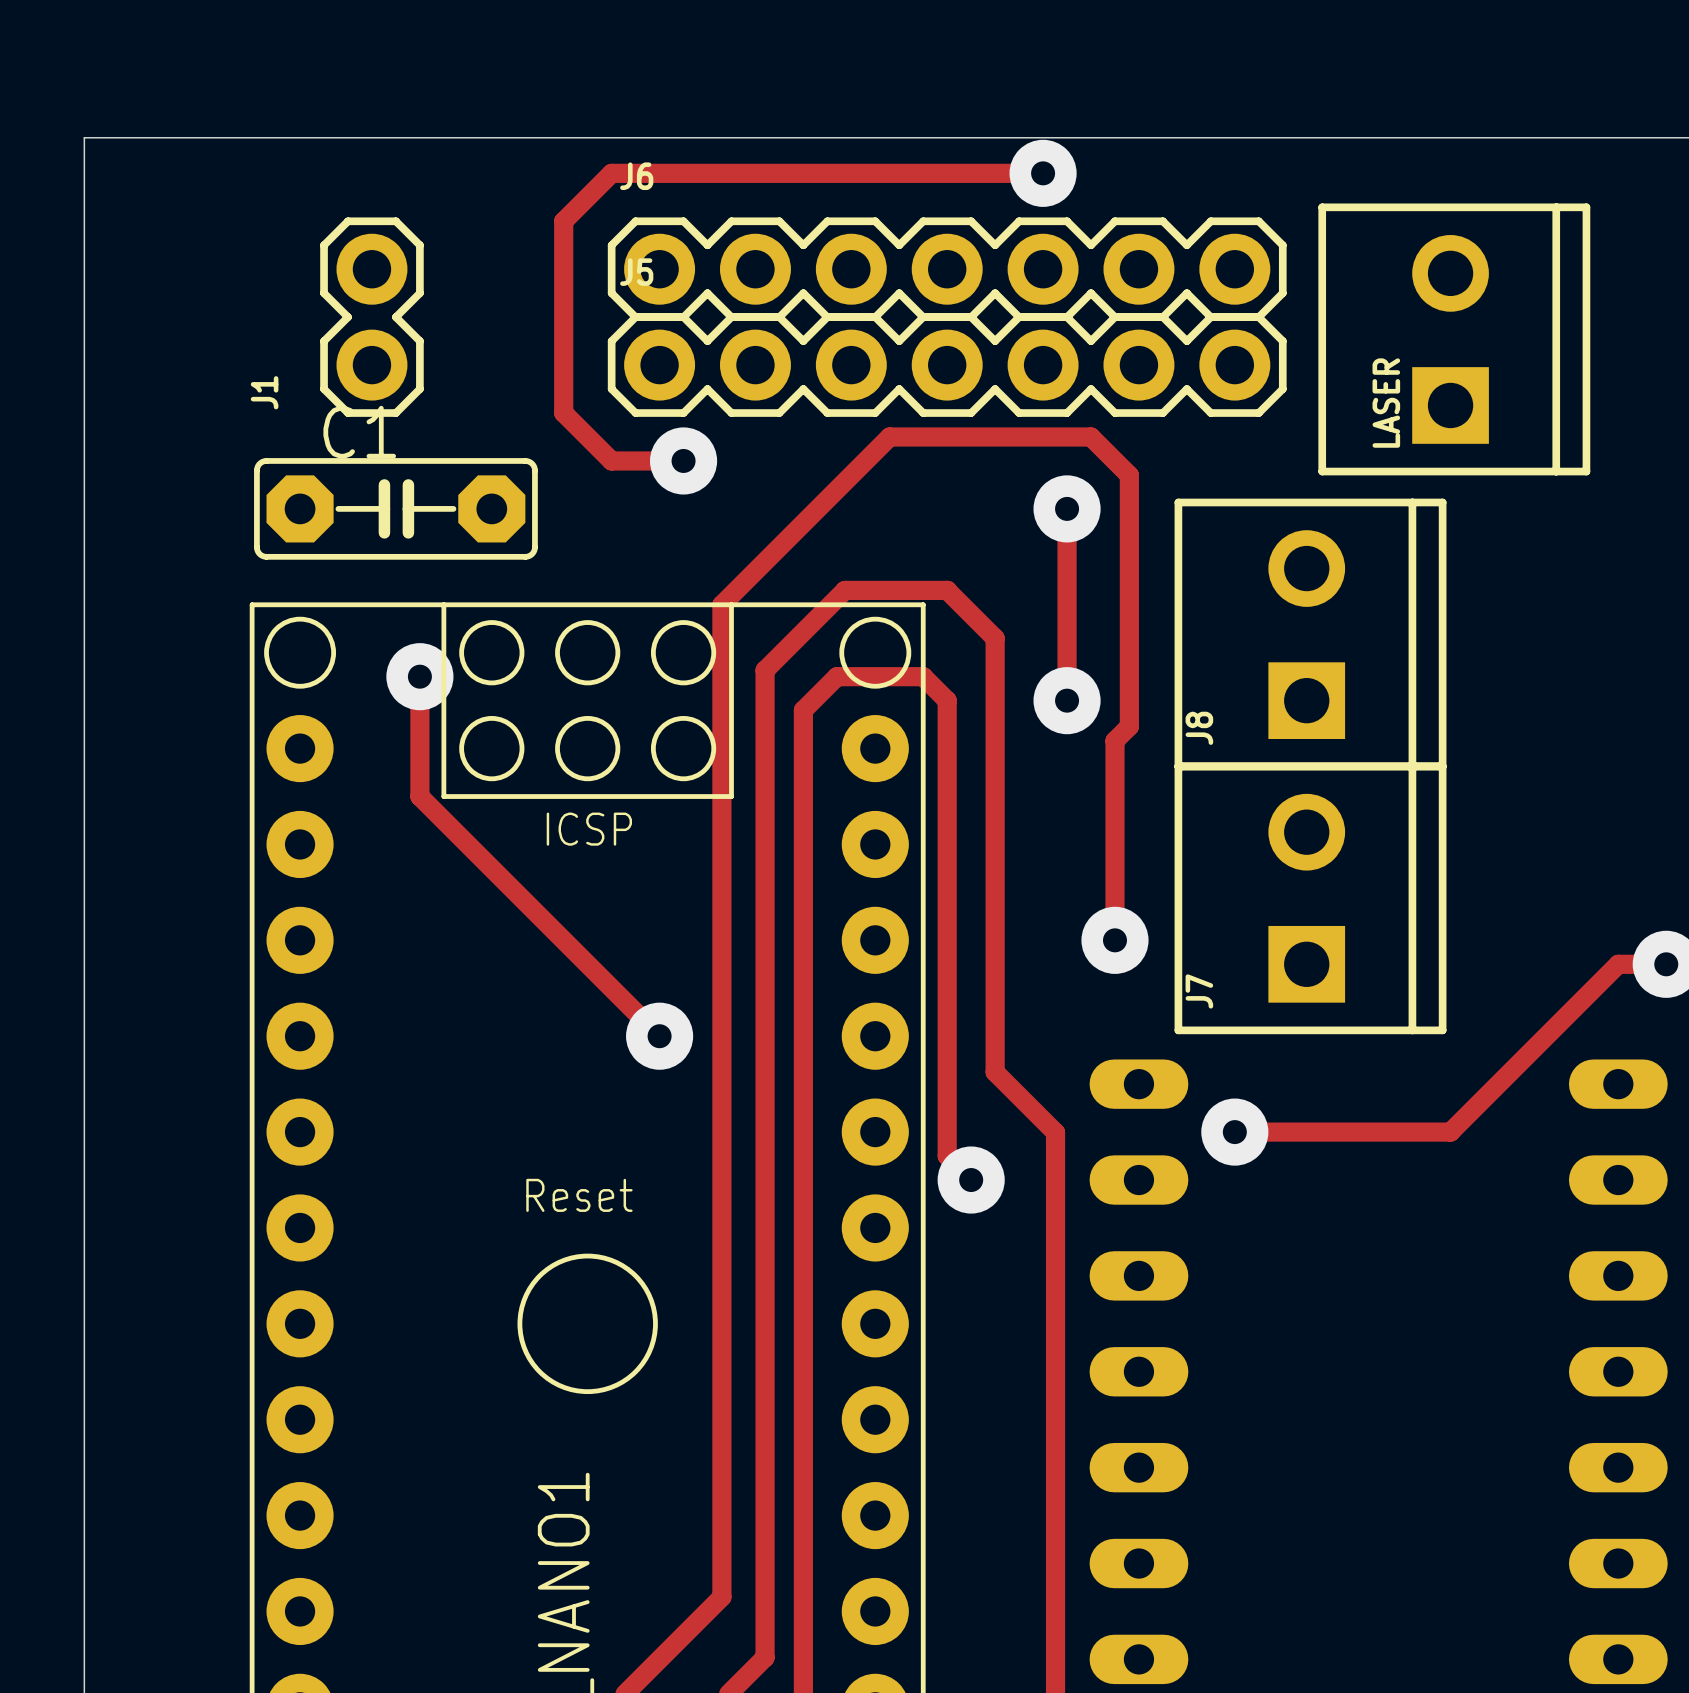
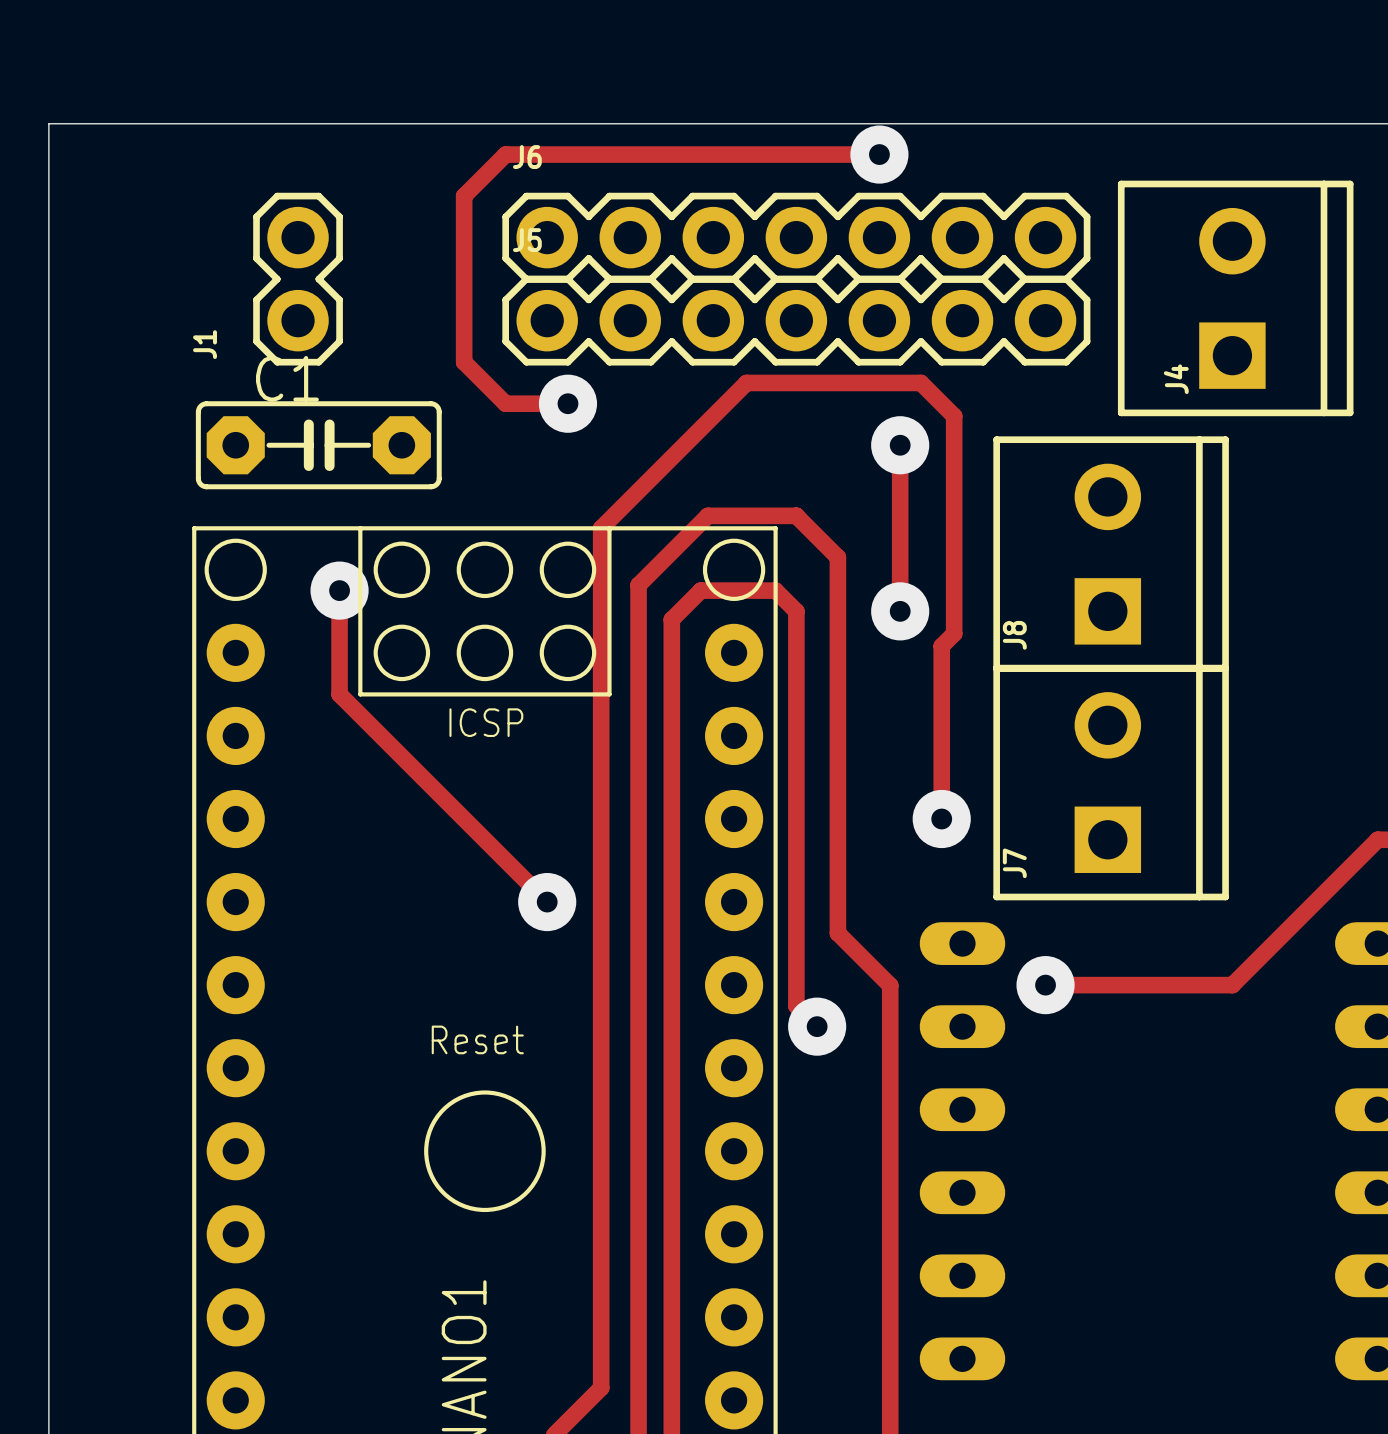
LASER name: LASER (1386, 403) -> J4 (1176, 379)

